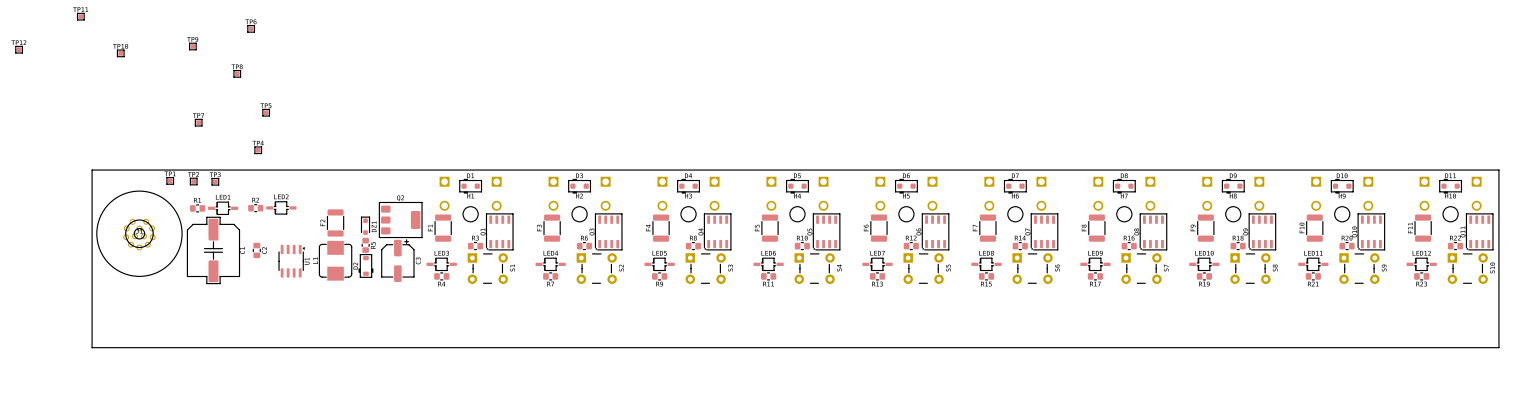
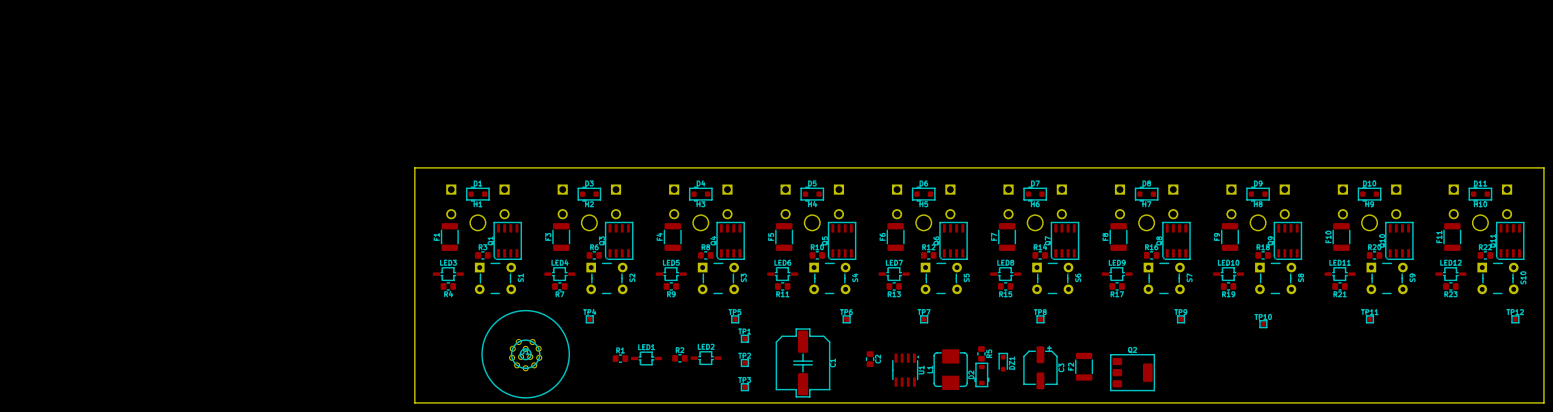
part position: (80, 16) -> (1369, 319)
part position: (251, 28) -> (846, 319)
part position: (192, 46) -> (1180, 319)
part position: (19, 49) -> (1515, 319)
part position: (120, 53) -> (1263, 324)
part position: (237, 73) -> (1040, 319)
part position: (266, 112) -> (735, 319)
part position: (198, 122) -> (924, 319)
part position: (258, 150) -> (589, 319)
board edge: (92, 170) (1498, 170) (1498, 347) (92, 347) (92, 170) -> (414, 167) (414, 402) (1543, 402) (1543, 167) (414, 167)
part position: (170, 180) -> (744, 338)
part position: (193, 181) -> (744, 362)
part position: (215, 181) -> (744, 387)
part position: (281, 207) -> (706, 358)
part position: (197, 208) -> (620, 358)
part position: (223, 208) -> (646, 358)
part position: (255, 208) -> (679, 358)
part position: (400, 220) -> (1132, 372)
part position: (335, 222) -> (1084, 366)
part position: (365, 225) -> (1003, 362)
part position: (139, 233) -> (525, 354)
part position: (365, 245) -> (981, 353)
part position: (213, 250) -> (803, 362)
part position: (256, 250) -> (870, 359)
part position: (335, 260) -> (950, 369)
part position: (397, 260) -> (1040, 367)
part position: (291, 261) -> (905, 370)
part position: (365, 265) -> (981, 374)

